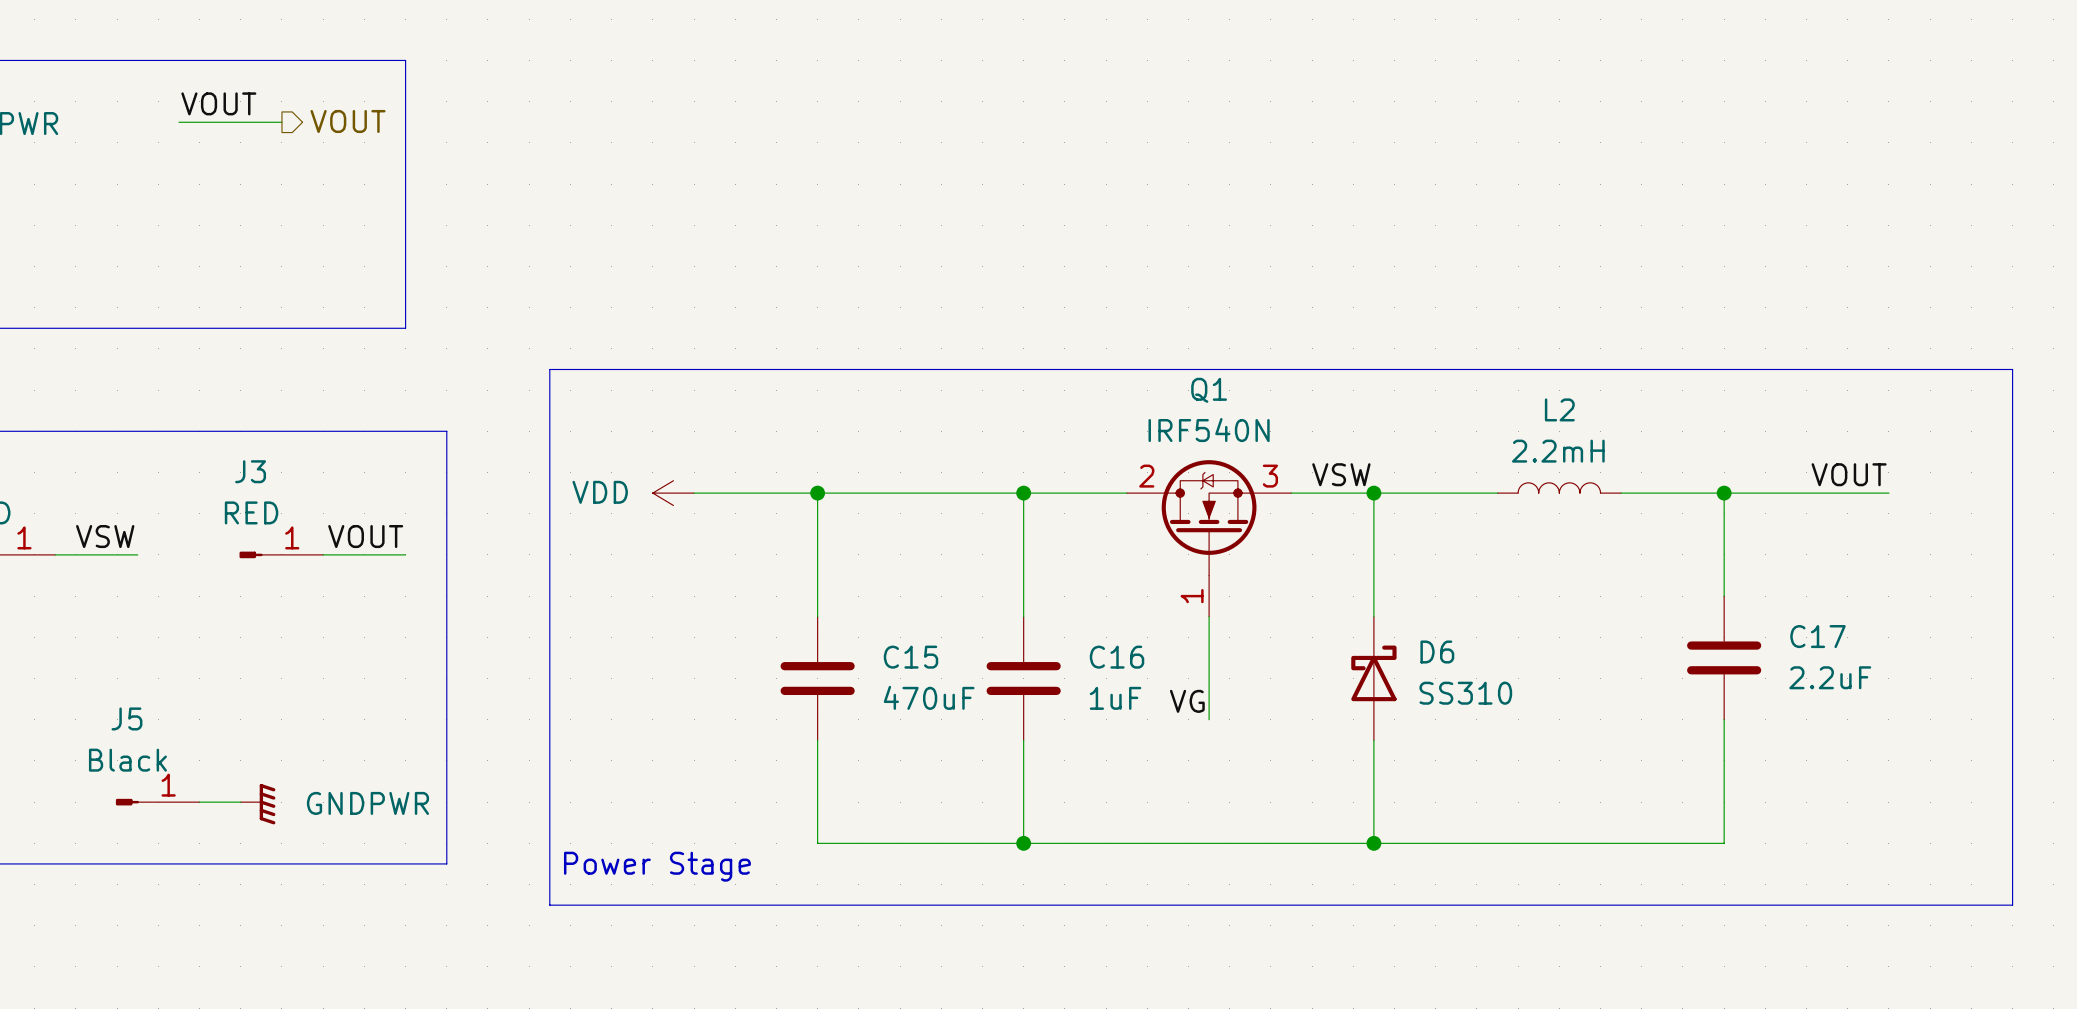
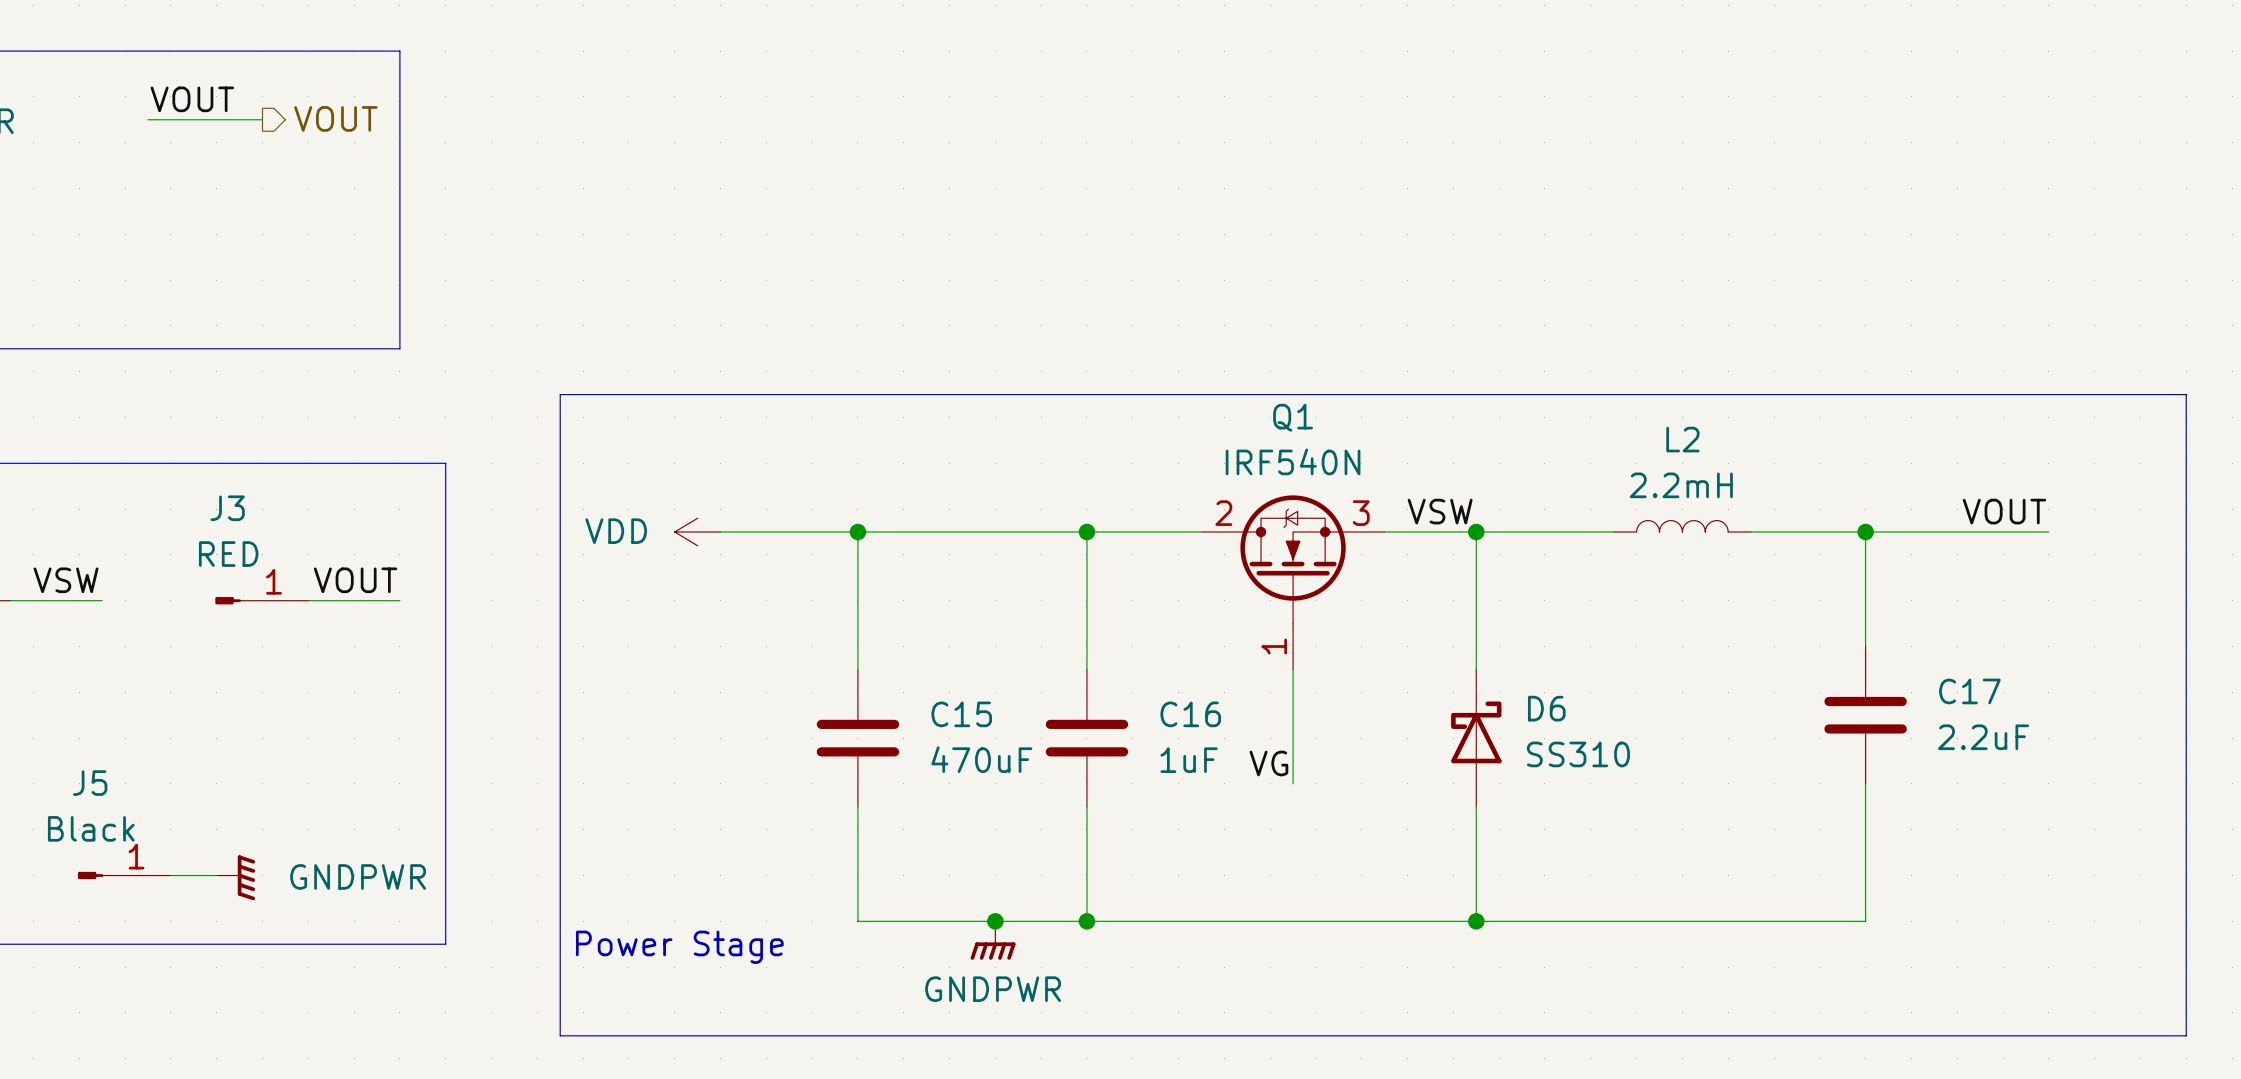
junction: none -> (995, 921)
power symbol: none -> GNDPWR (993, 940)
line: (549, 905) (2012, 905) -> (560, 990) (560, 1035) (2186, 1035) (2186, 990)

